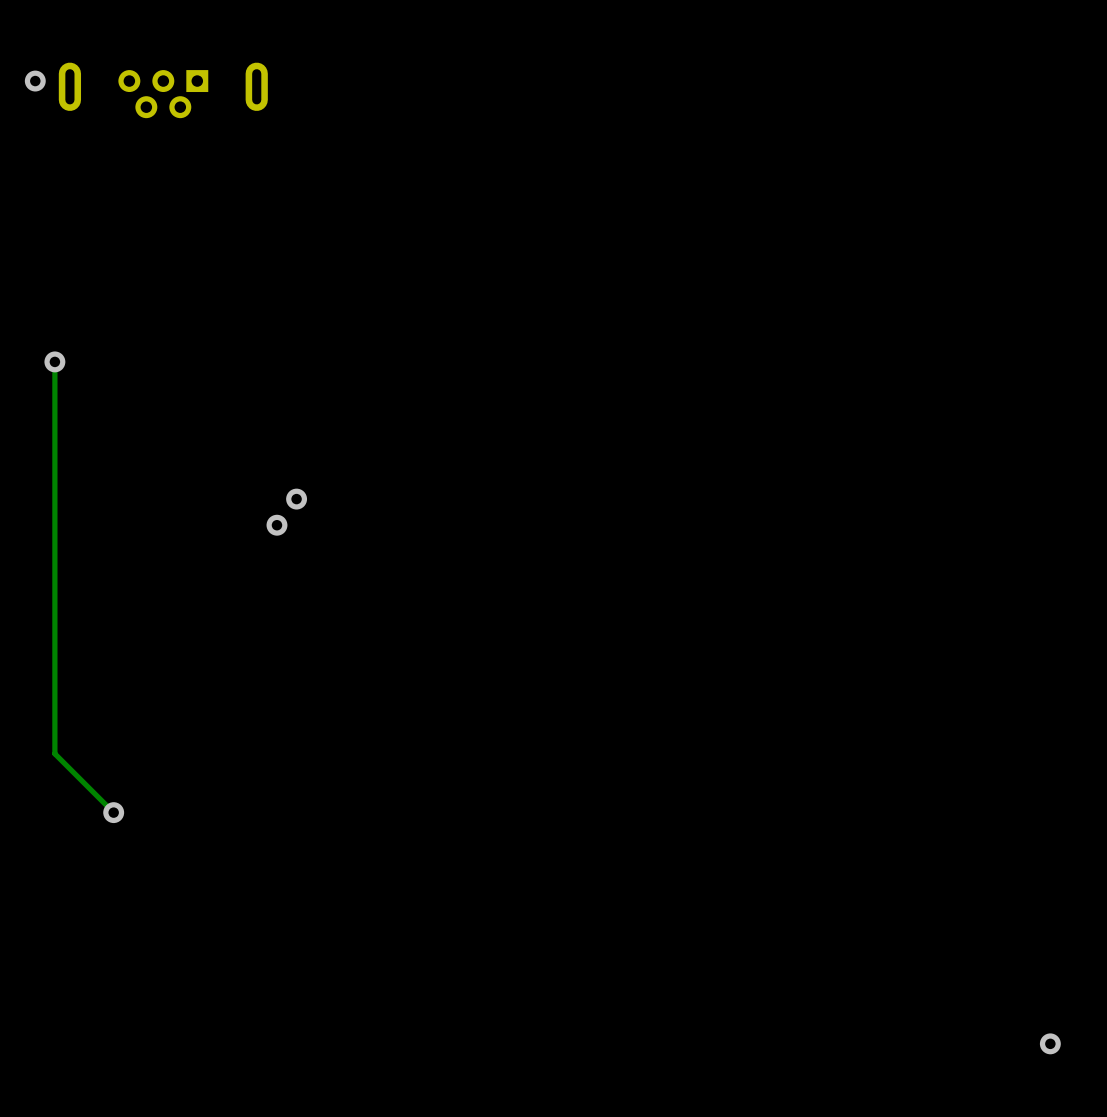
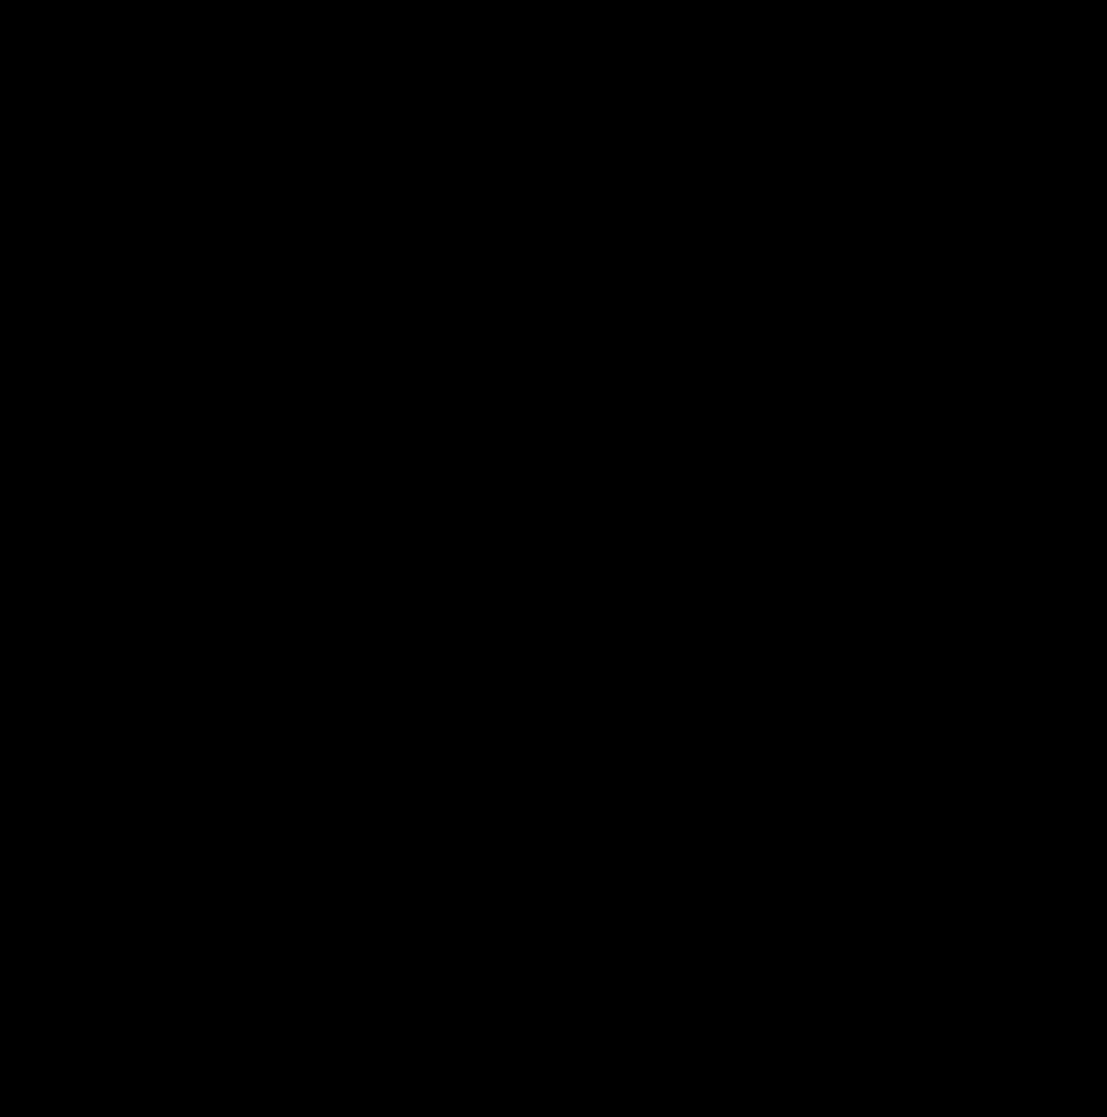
via: (35, 81) -> none
part: (163, 90) -> none
track: (54, 361) (54, 753) (113, 812) -> none
via: (54, 361) -> none
via: (296, 499) -> none
via: (276, 525) -> none
via: (113, 812) -> none
via: (1050, 1043) -> none

